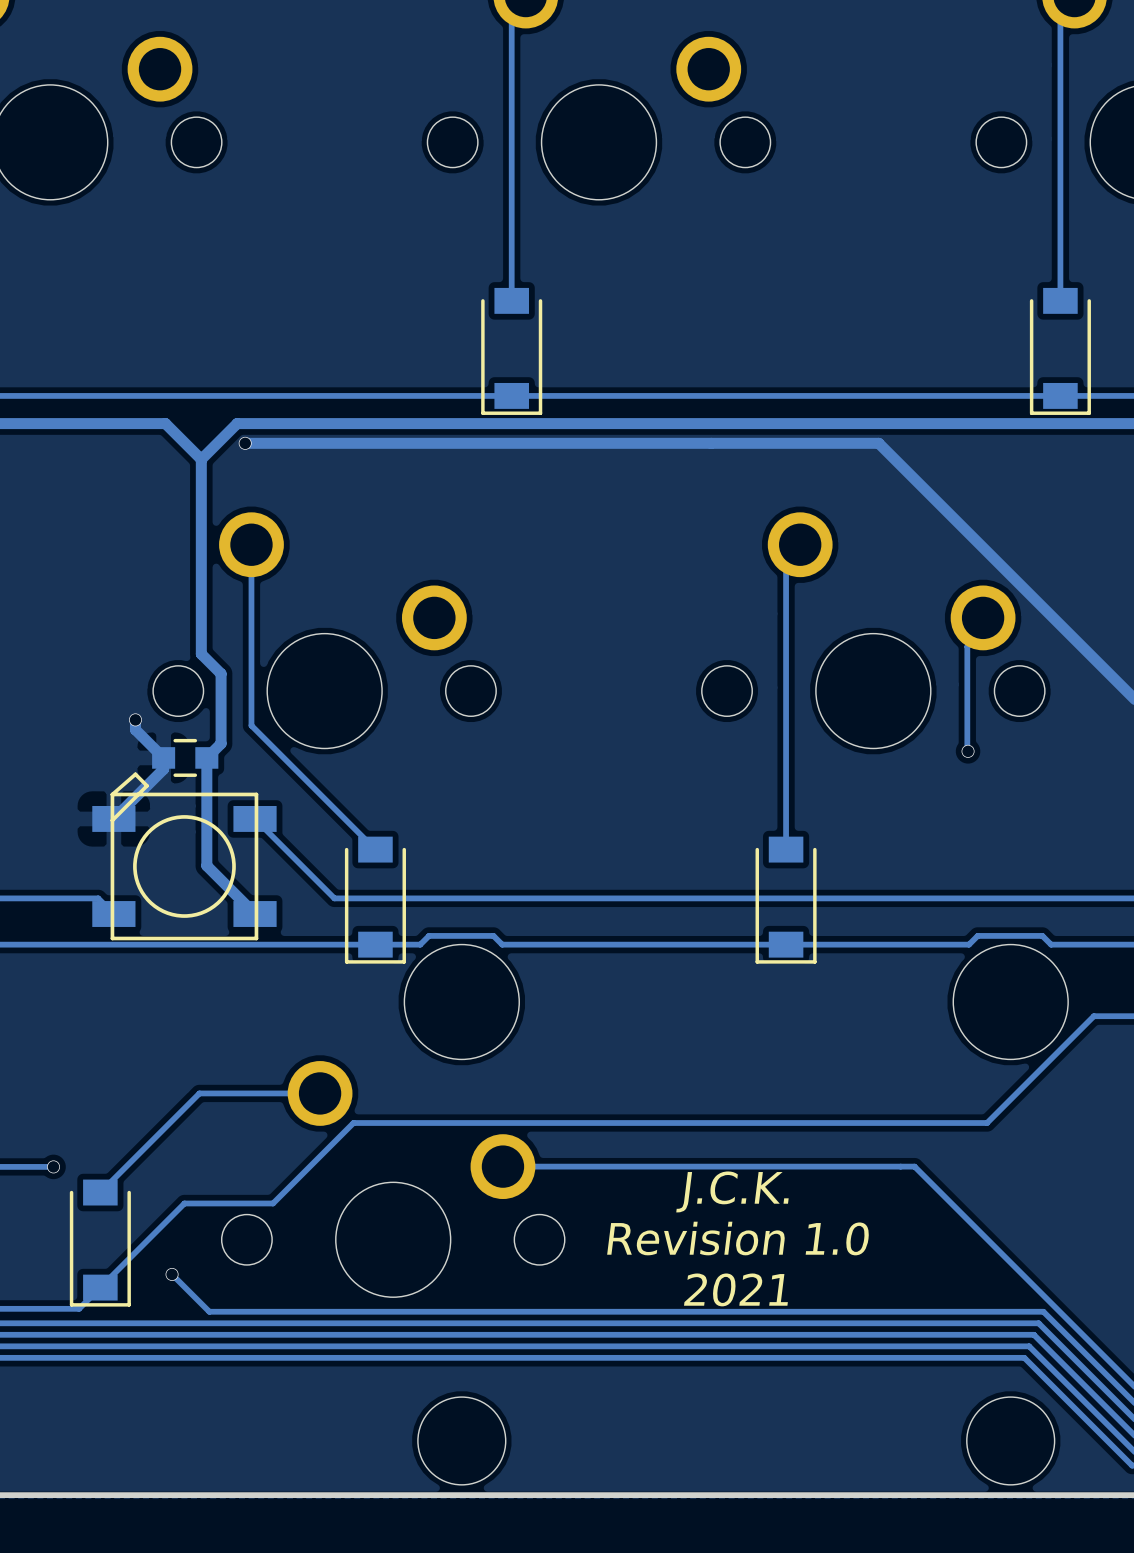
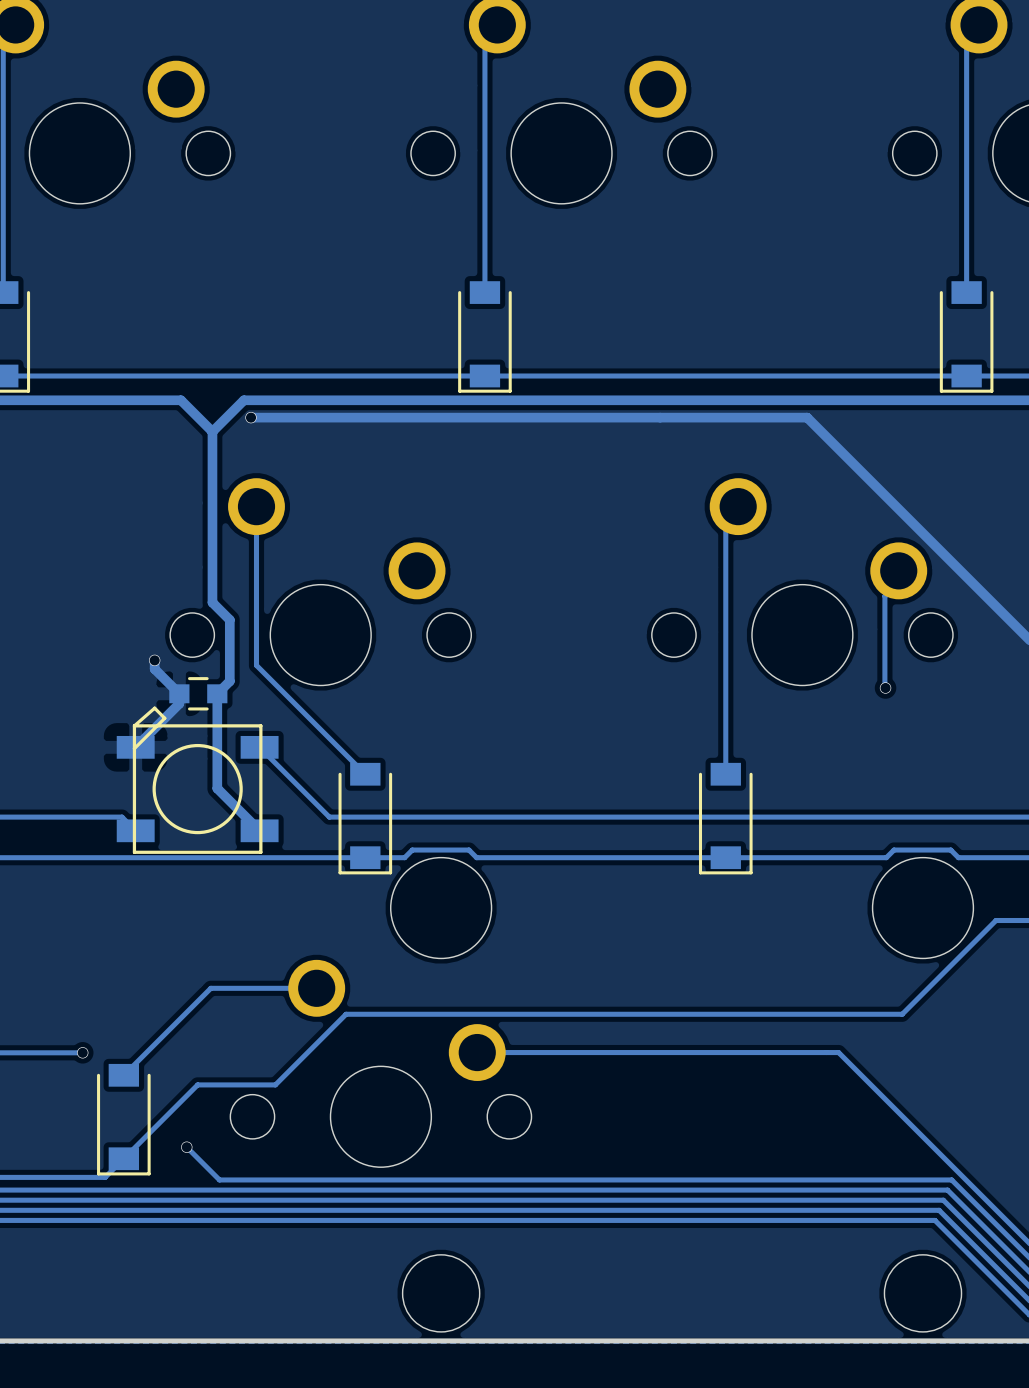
text: J.C.K. (732, 1191) -> none
text: Revision 1.0 (738, 1238) -> none
text: 2021 (735, 1289) -> none

